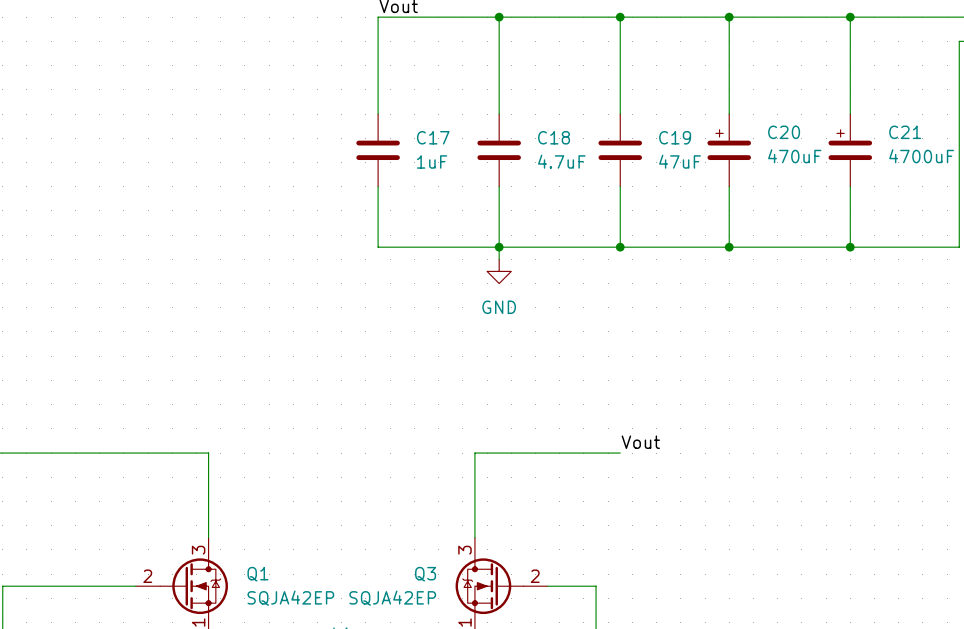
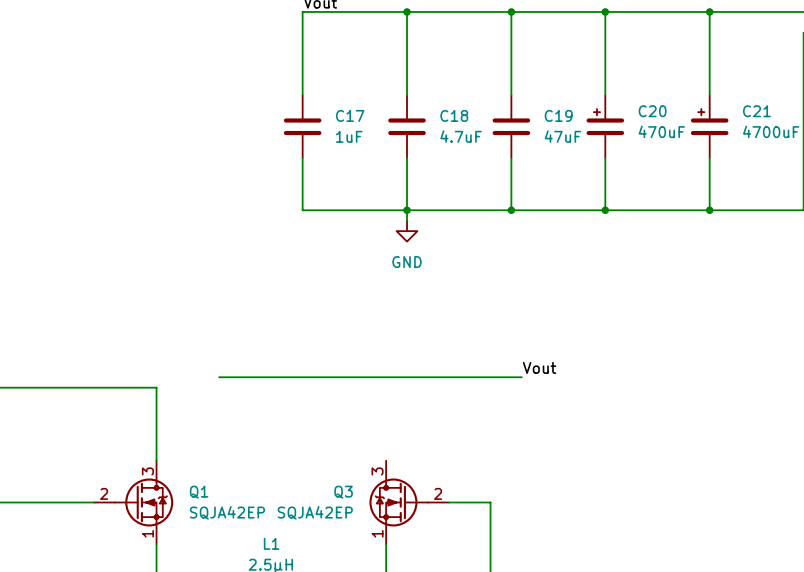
wire: none -> (219, 377) (521, 377)
label position: Vout (640, 442) -> Vout (539, 367)
wire: (620, 453) (474, 453) (474, 537) -> none

